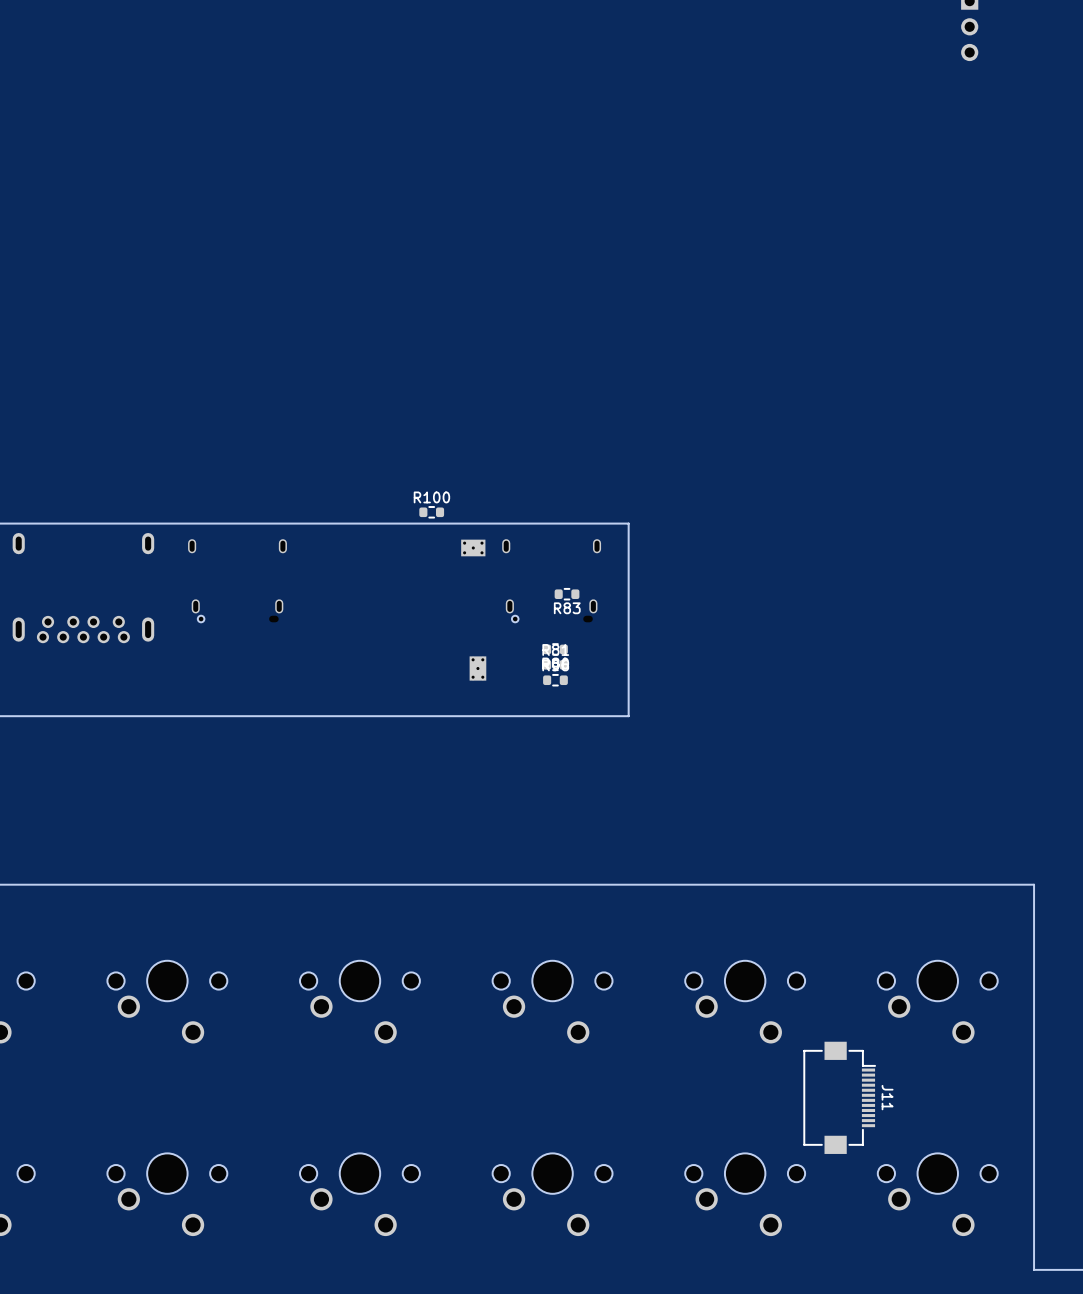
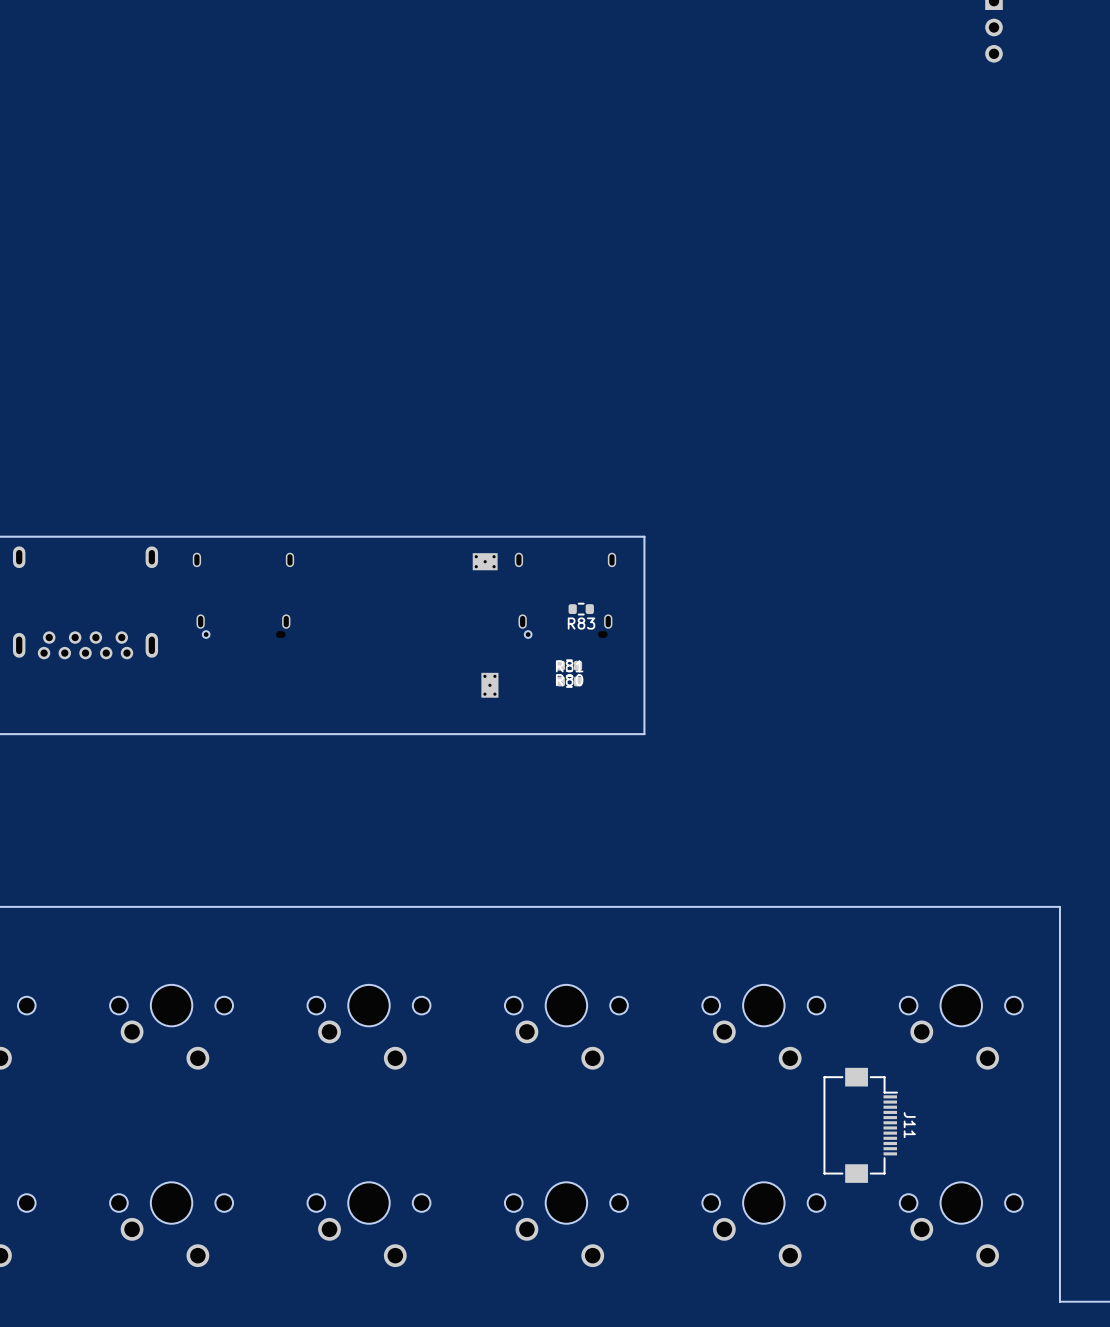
R100: (431, 512) -> none
part: (555, 680) -> none

